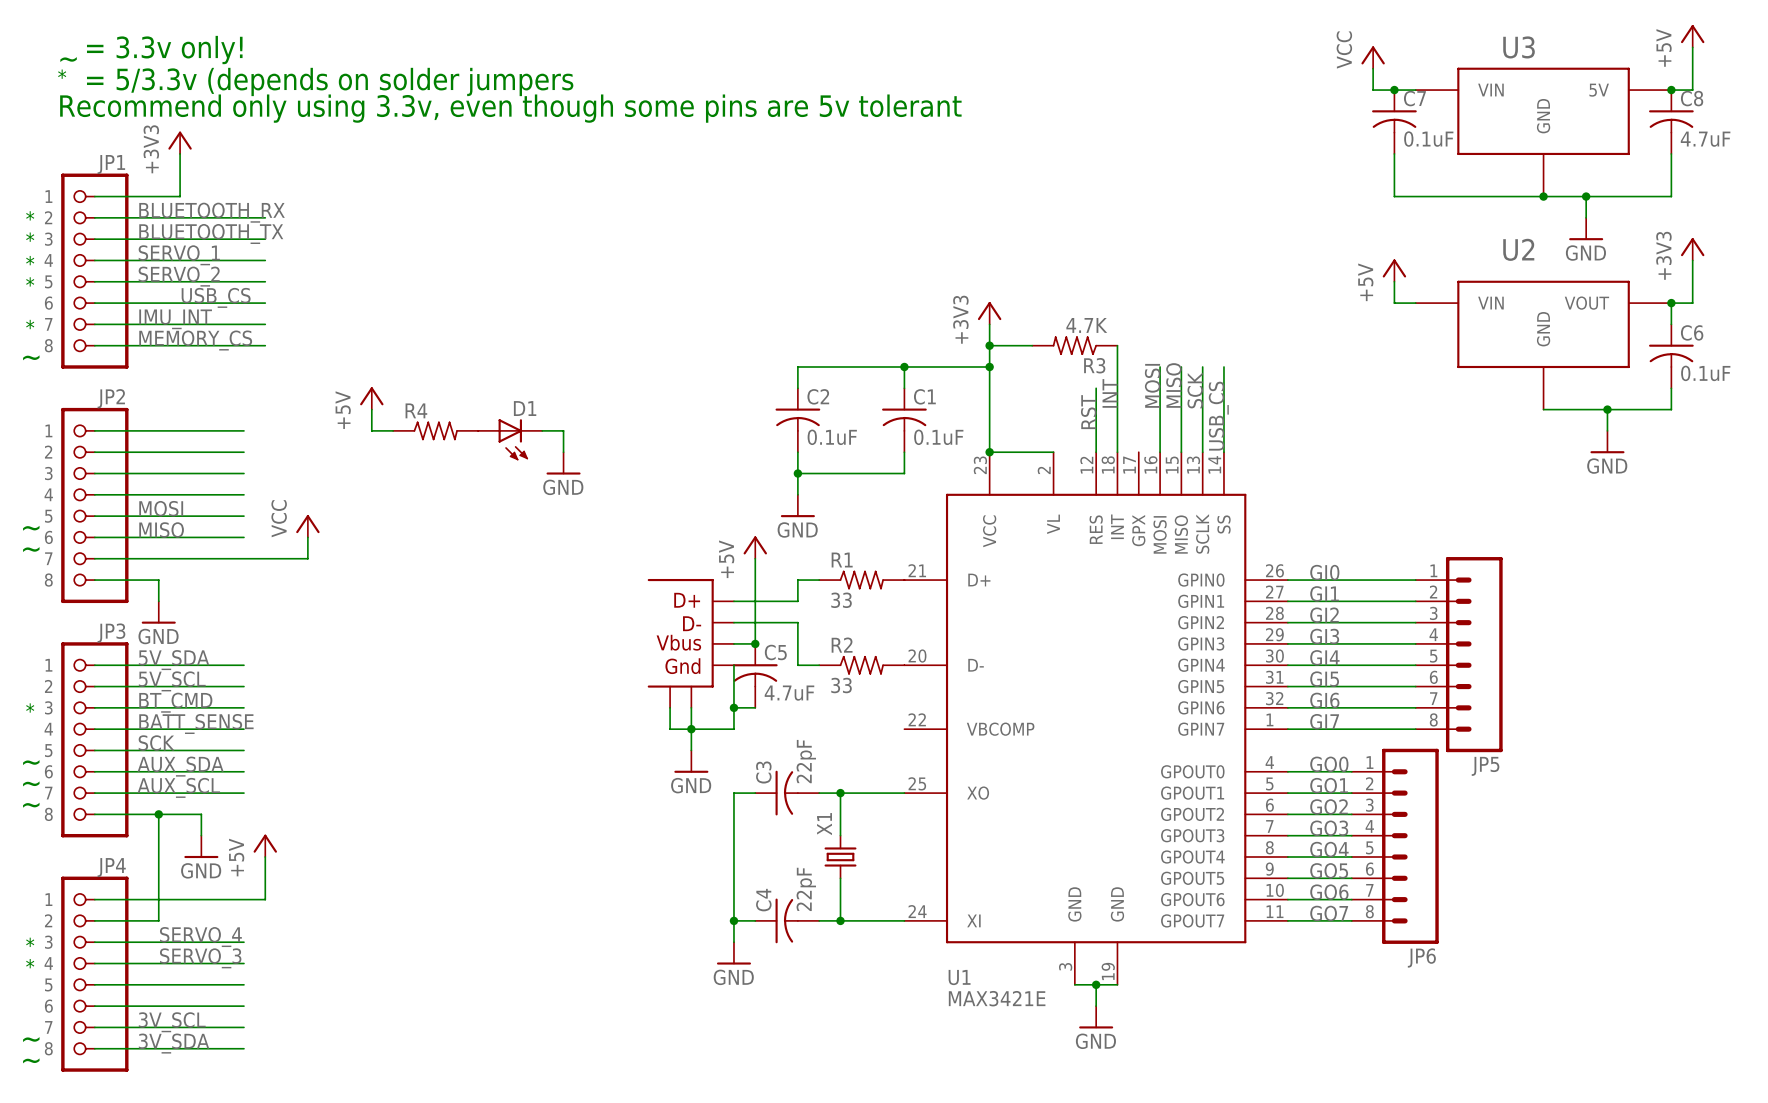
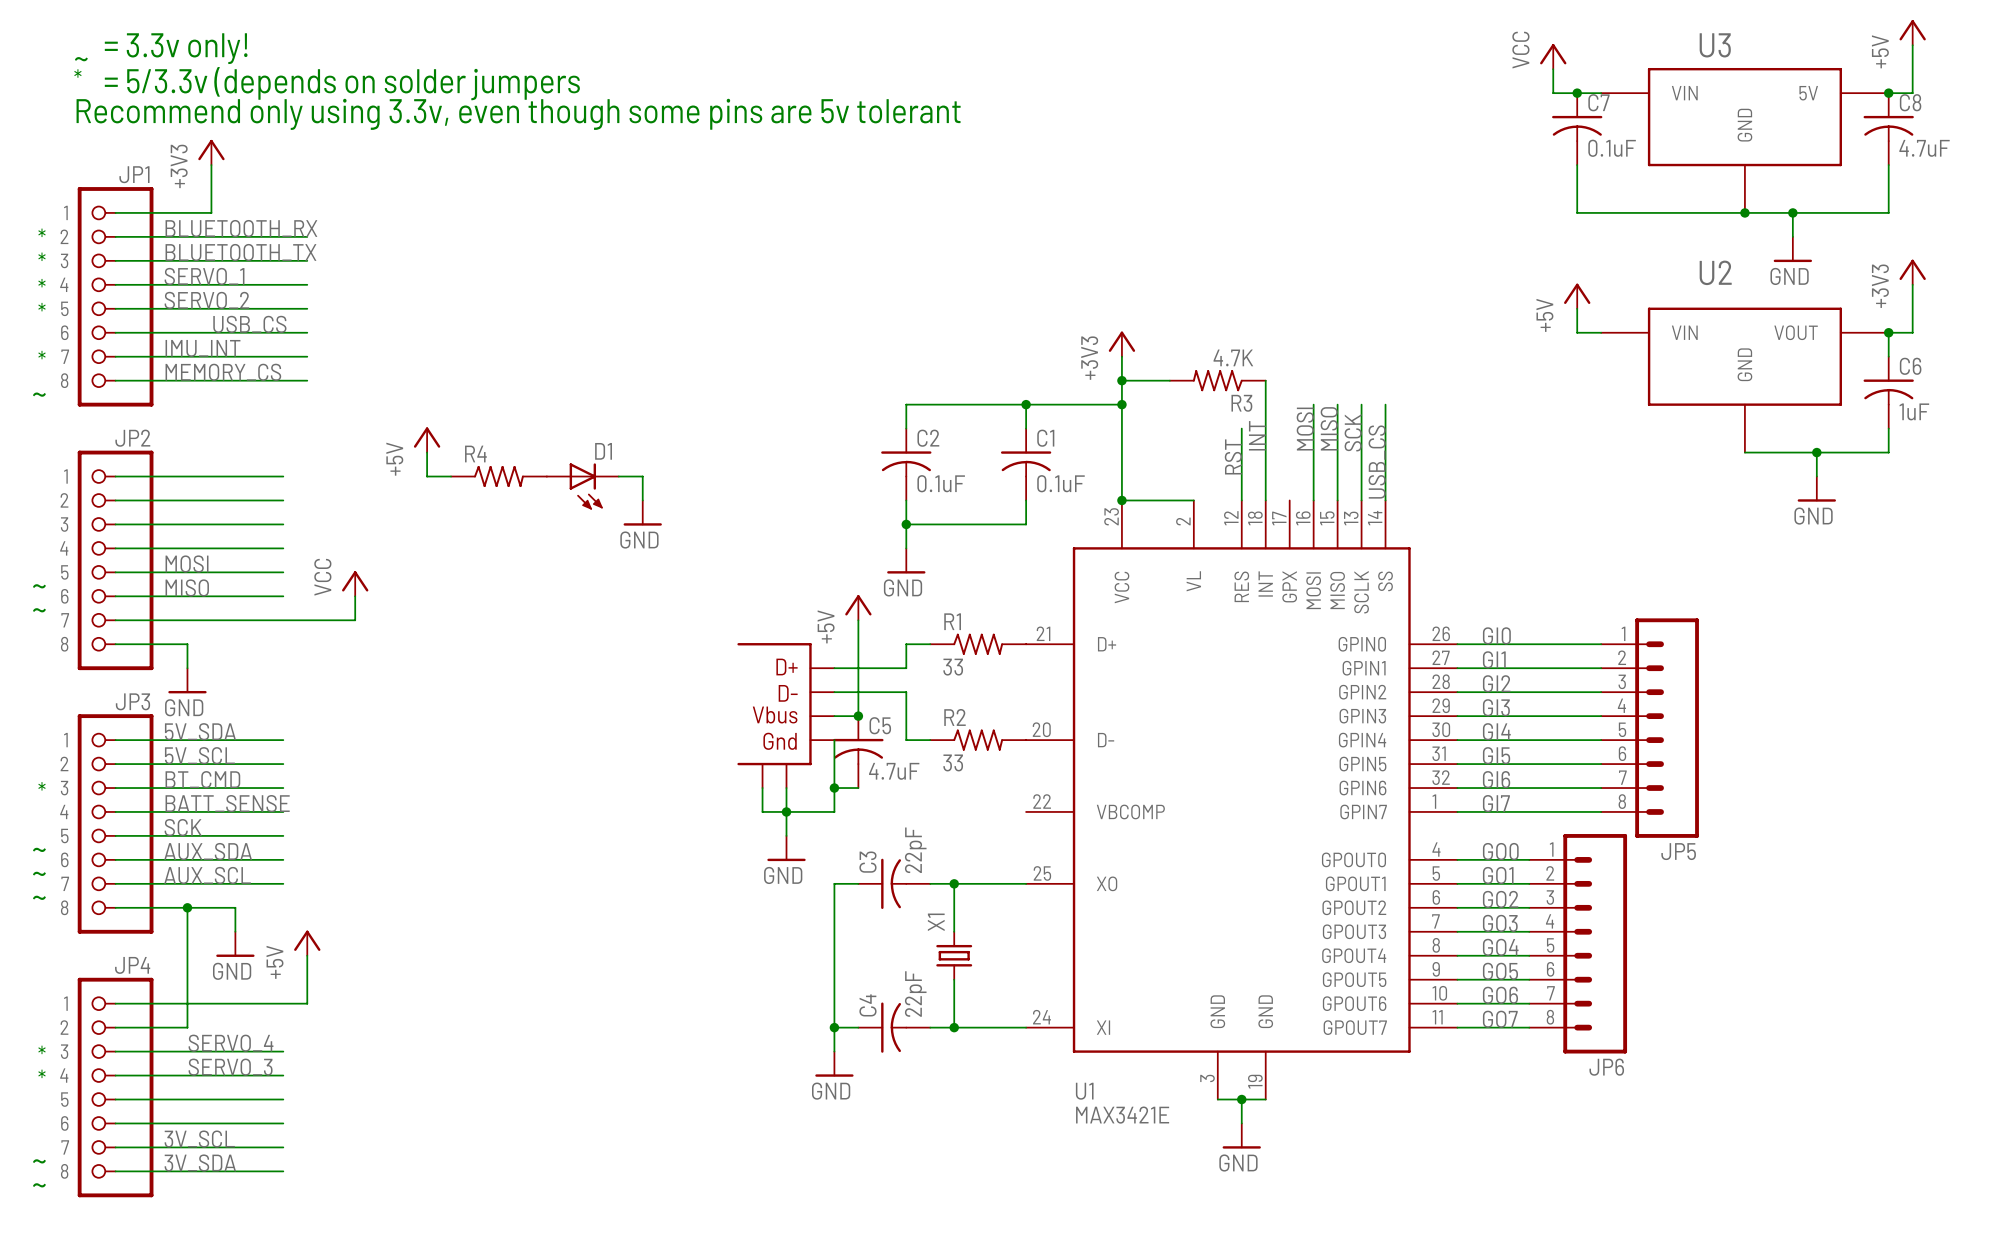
C6 value: 0.1uF (1705, 373) -> 1uF (1914, 411)

